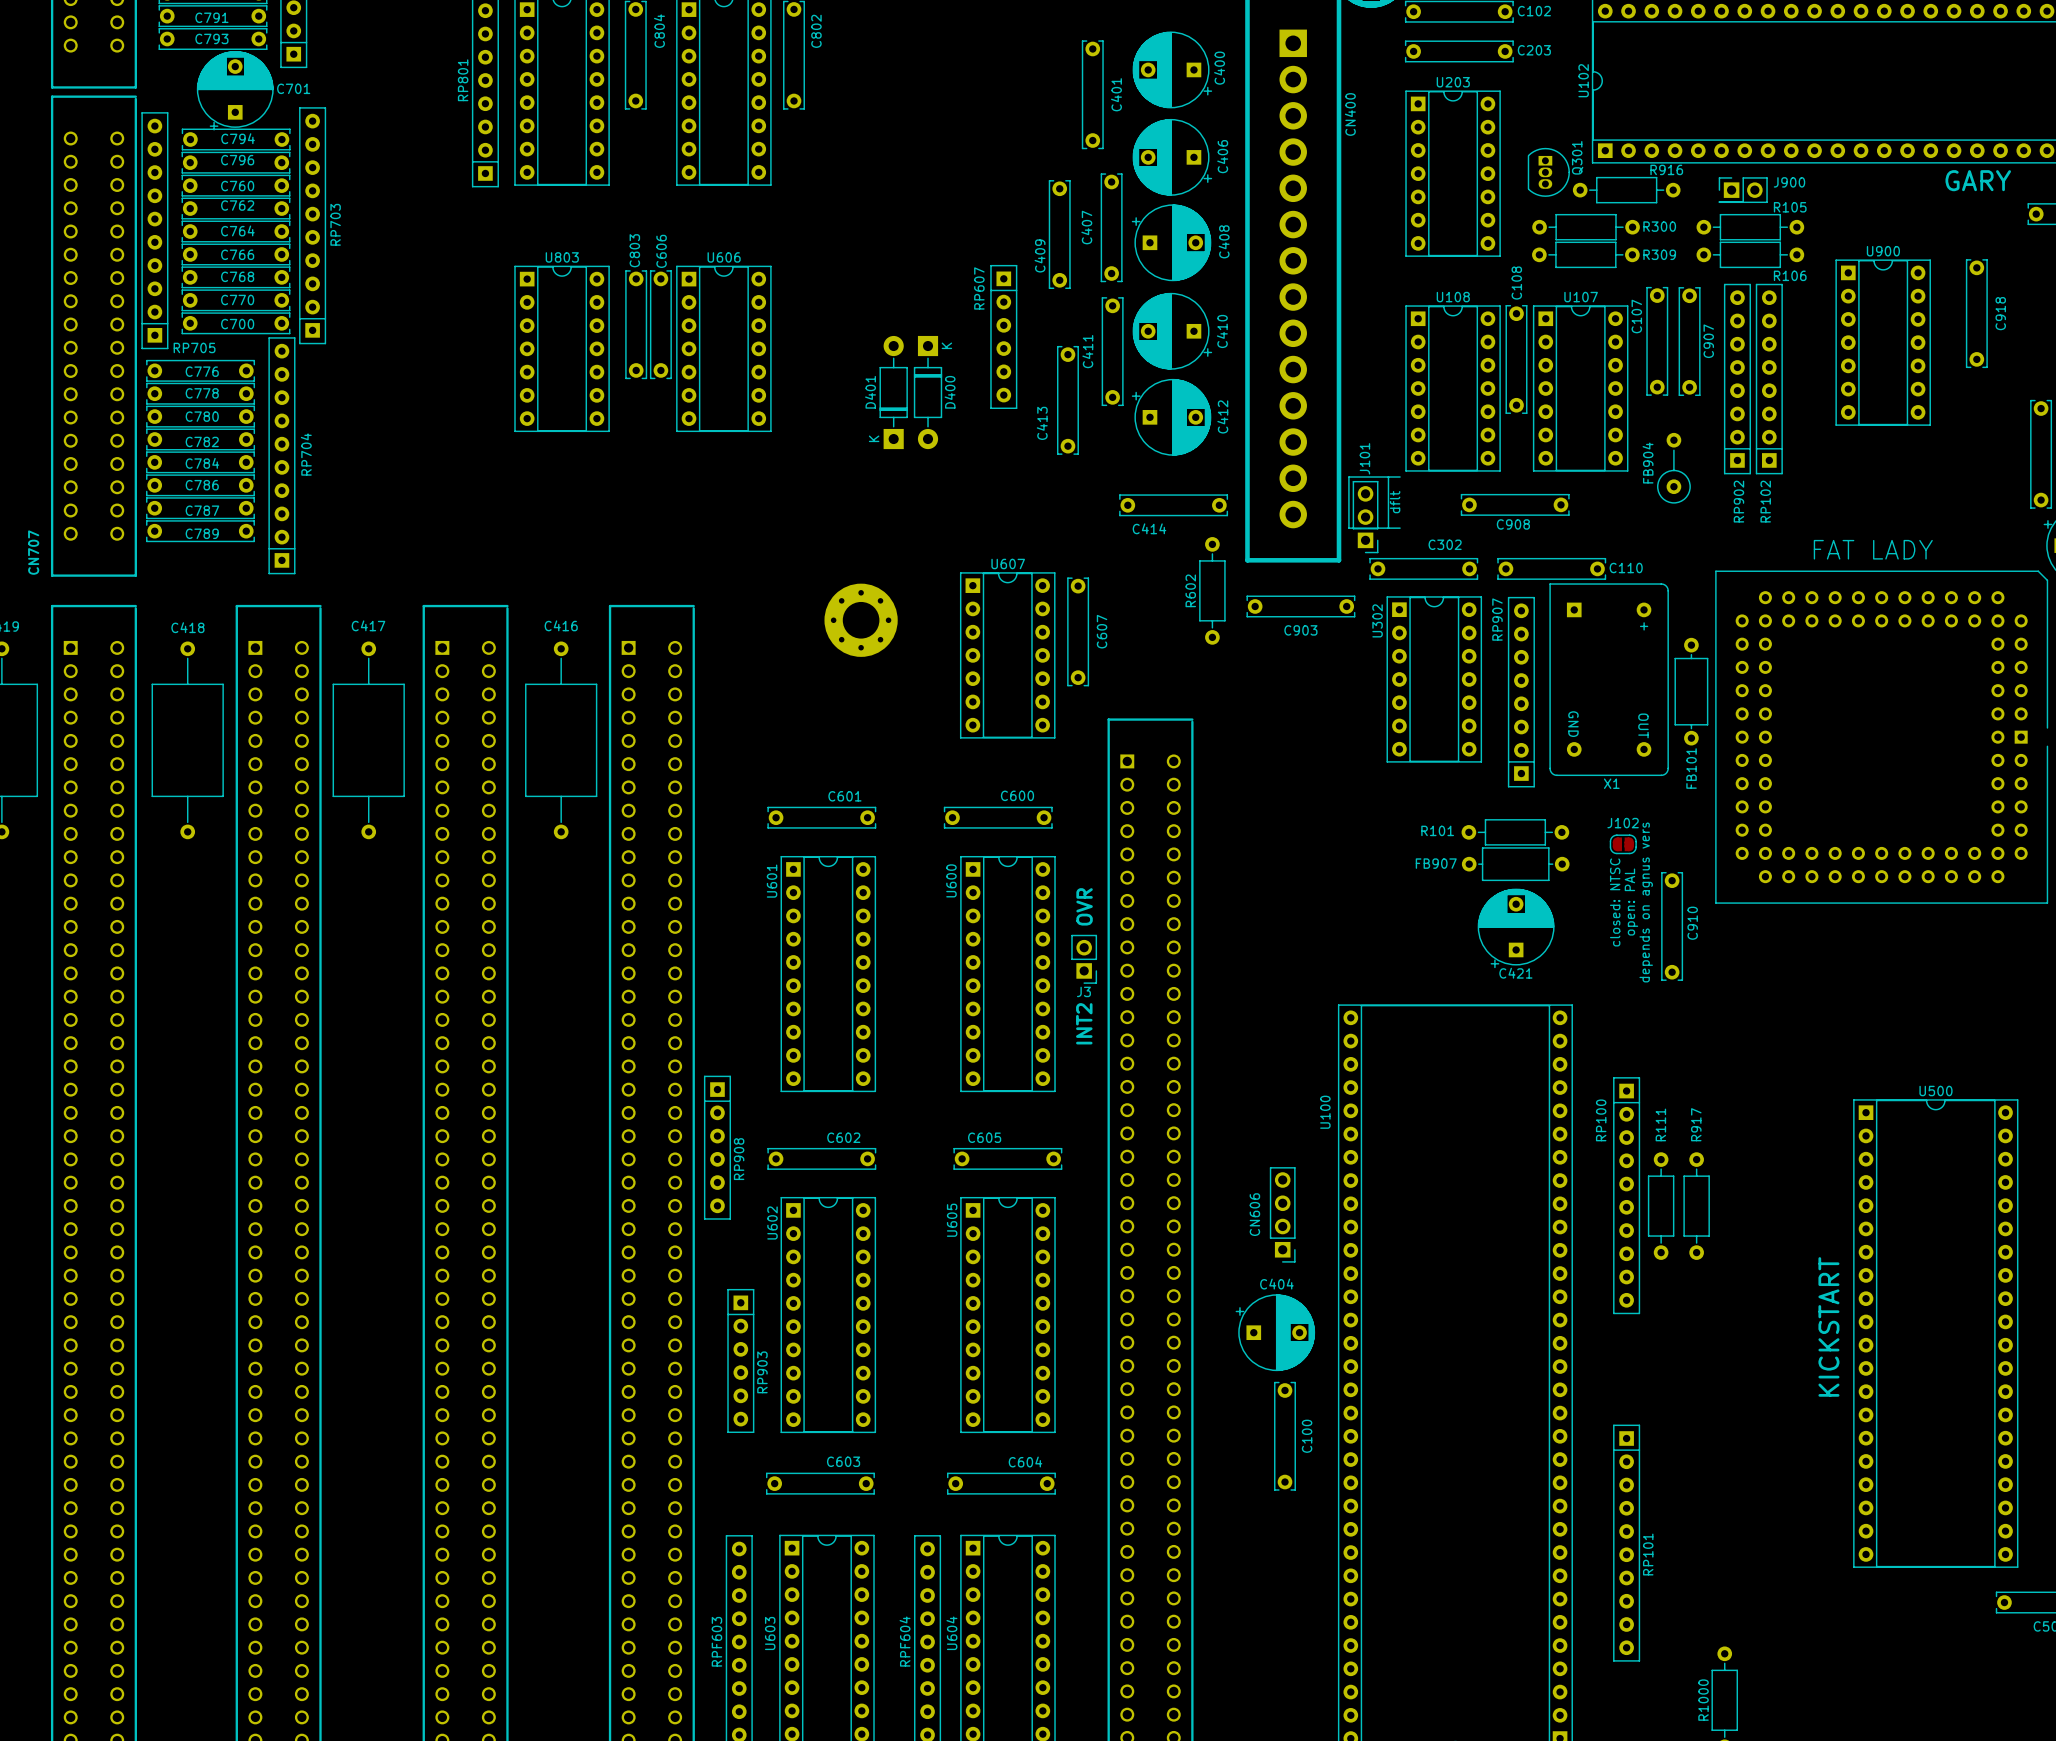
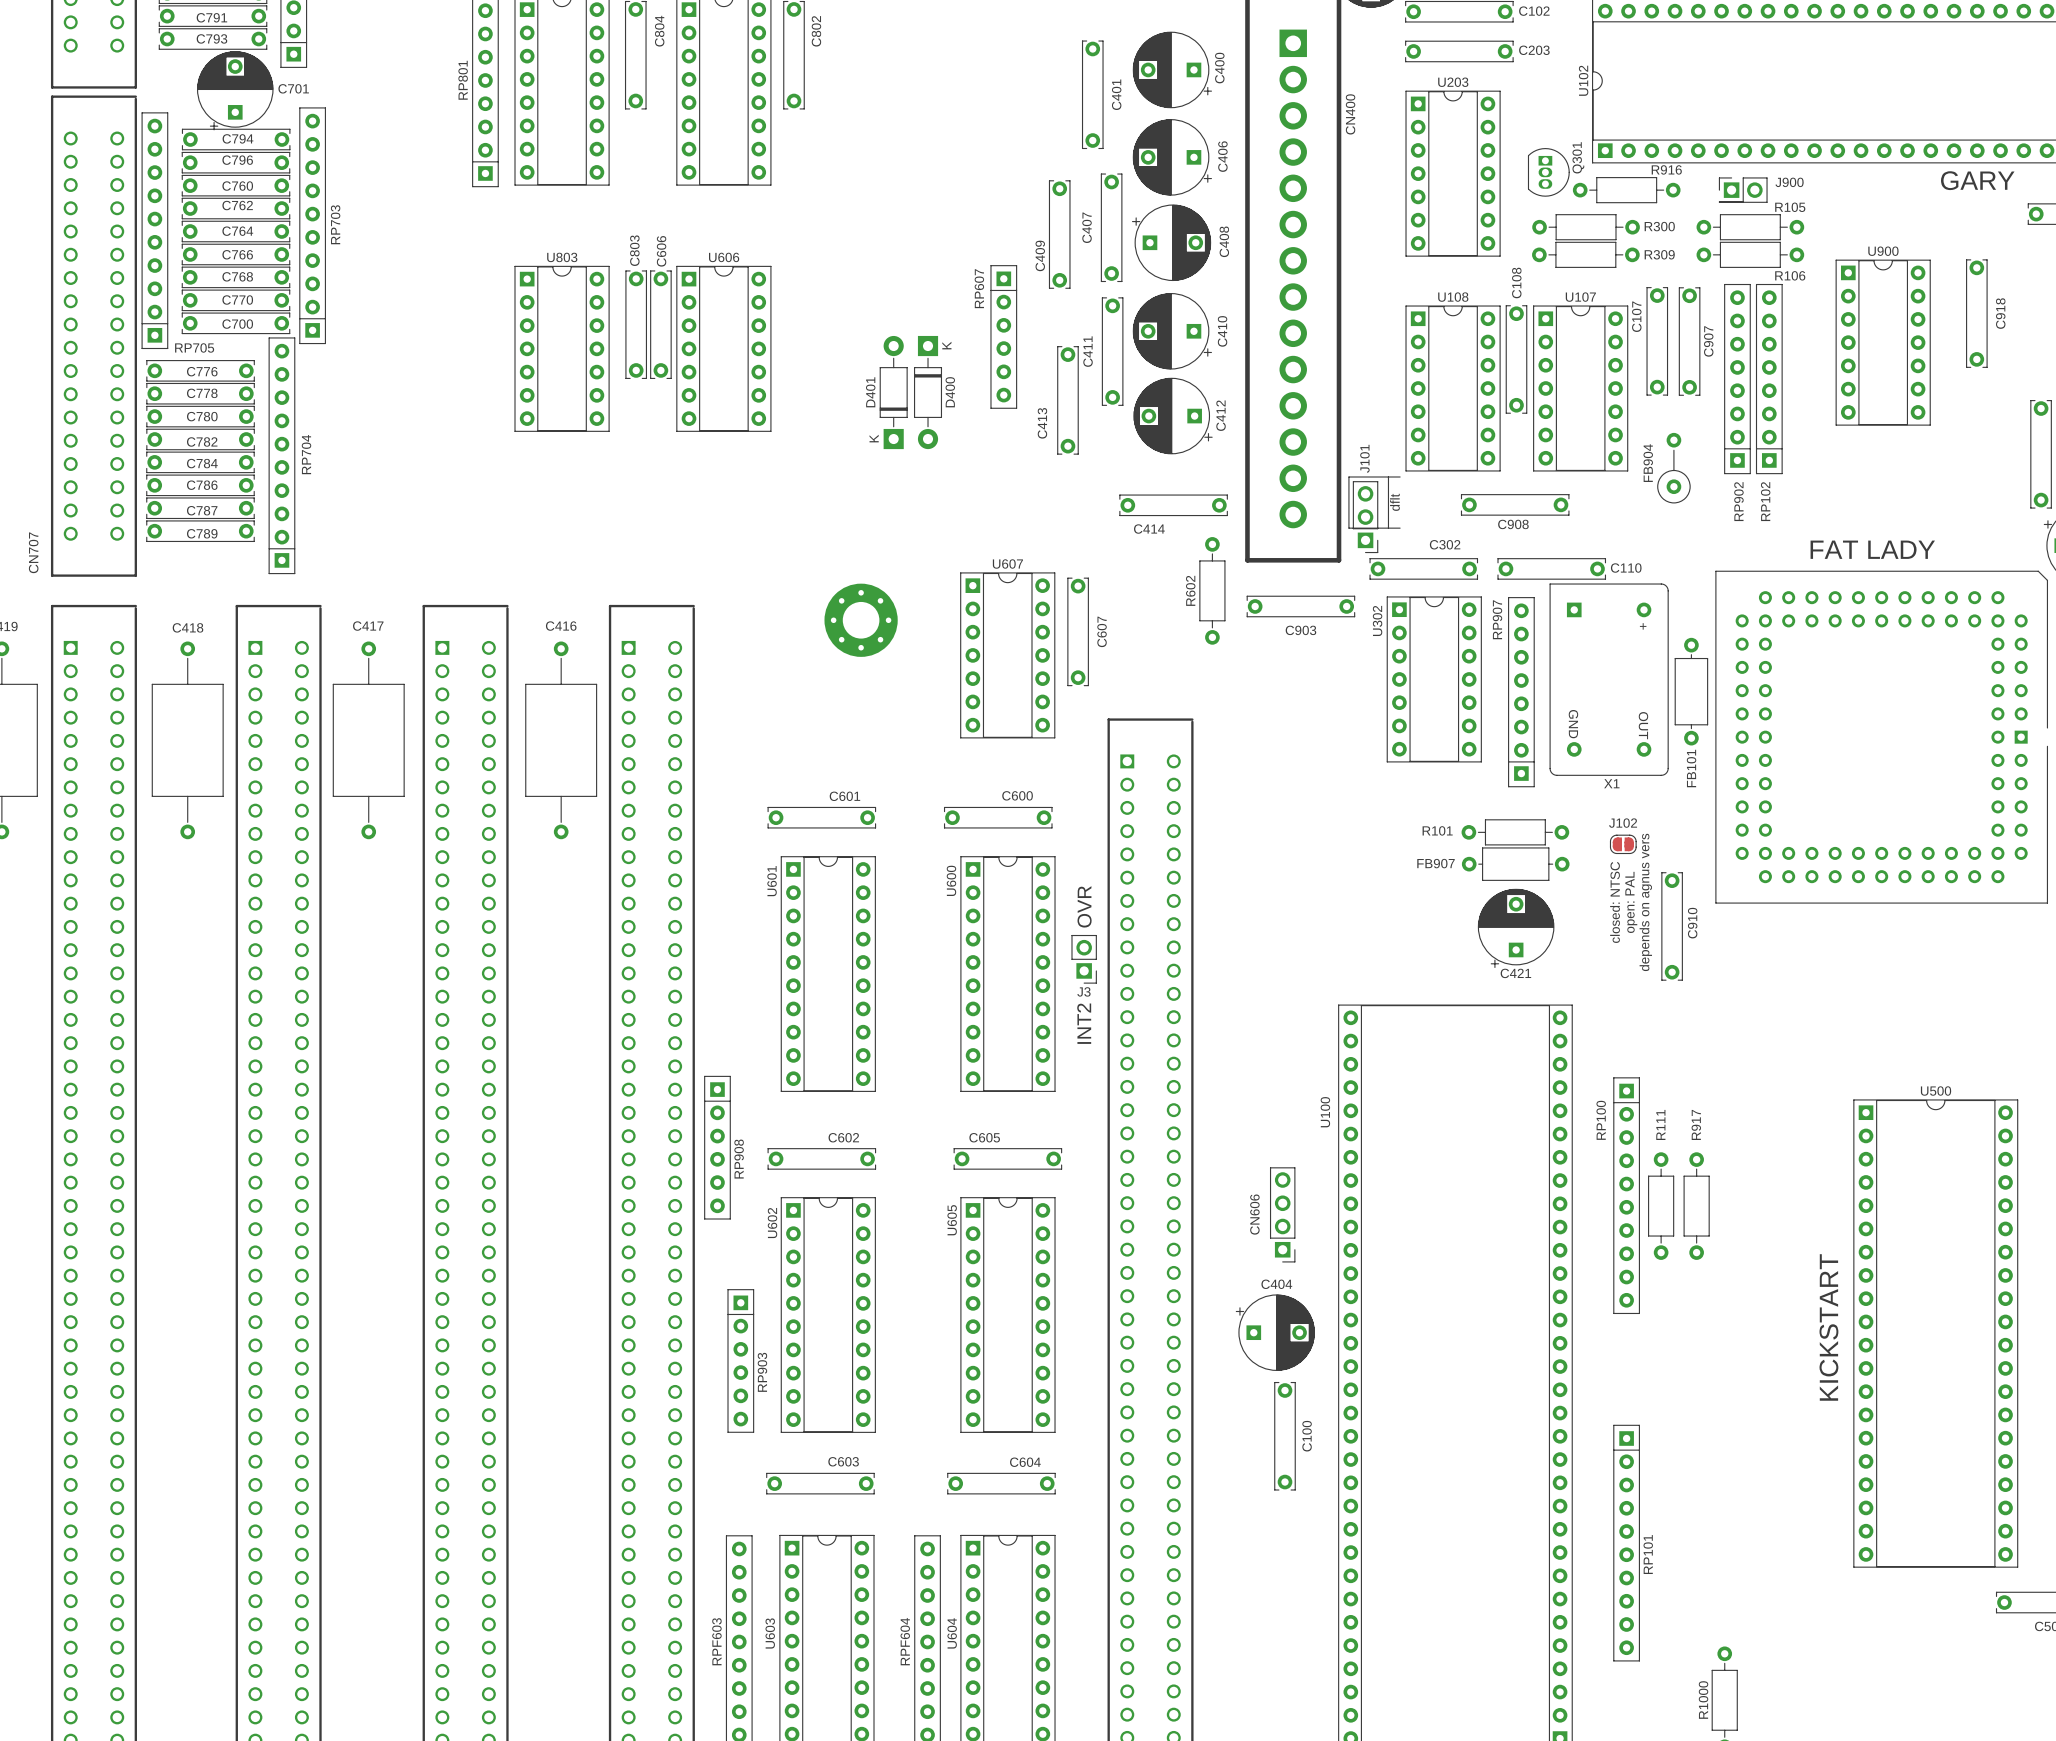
C412 rotation: 0° (1171, 417) -> 180° (1173, 416)

